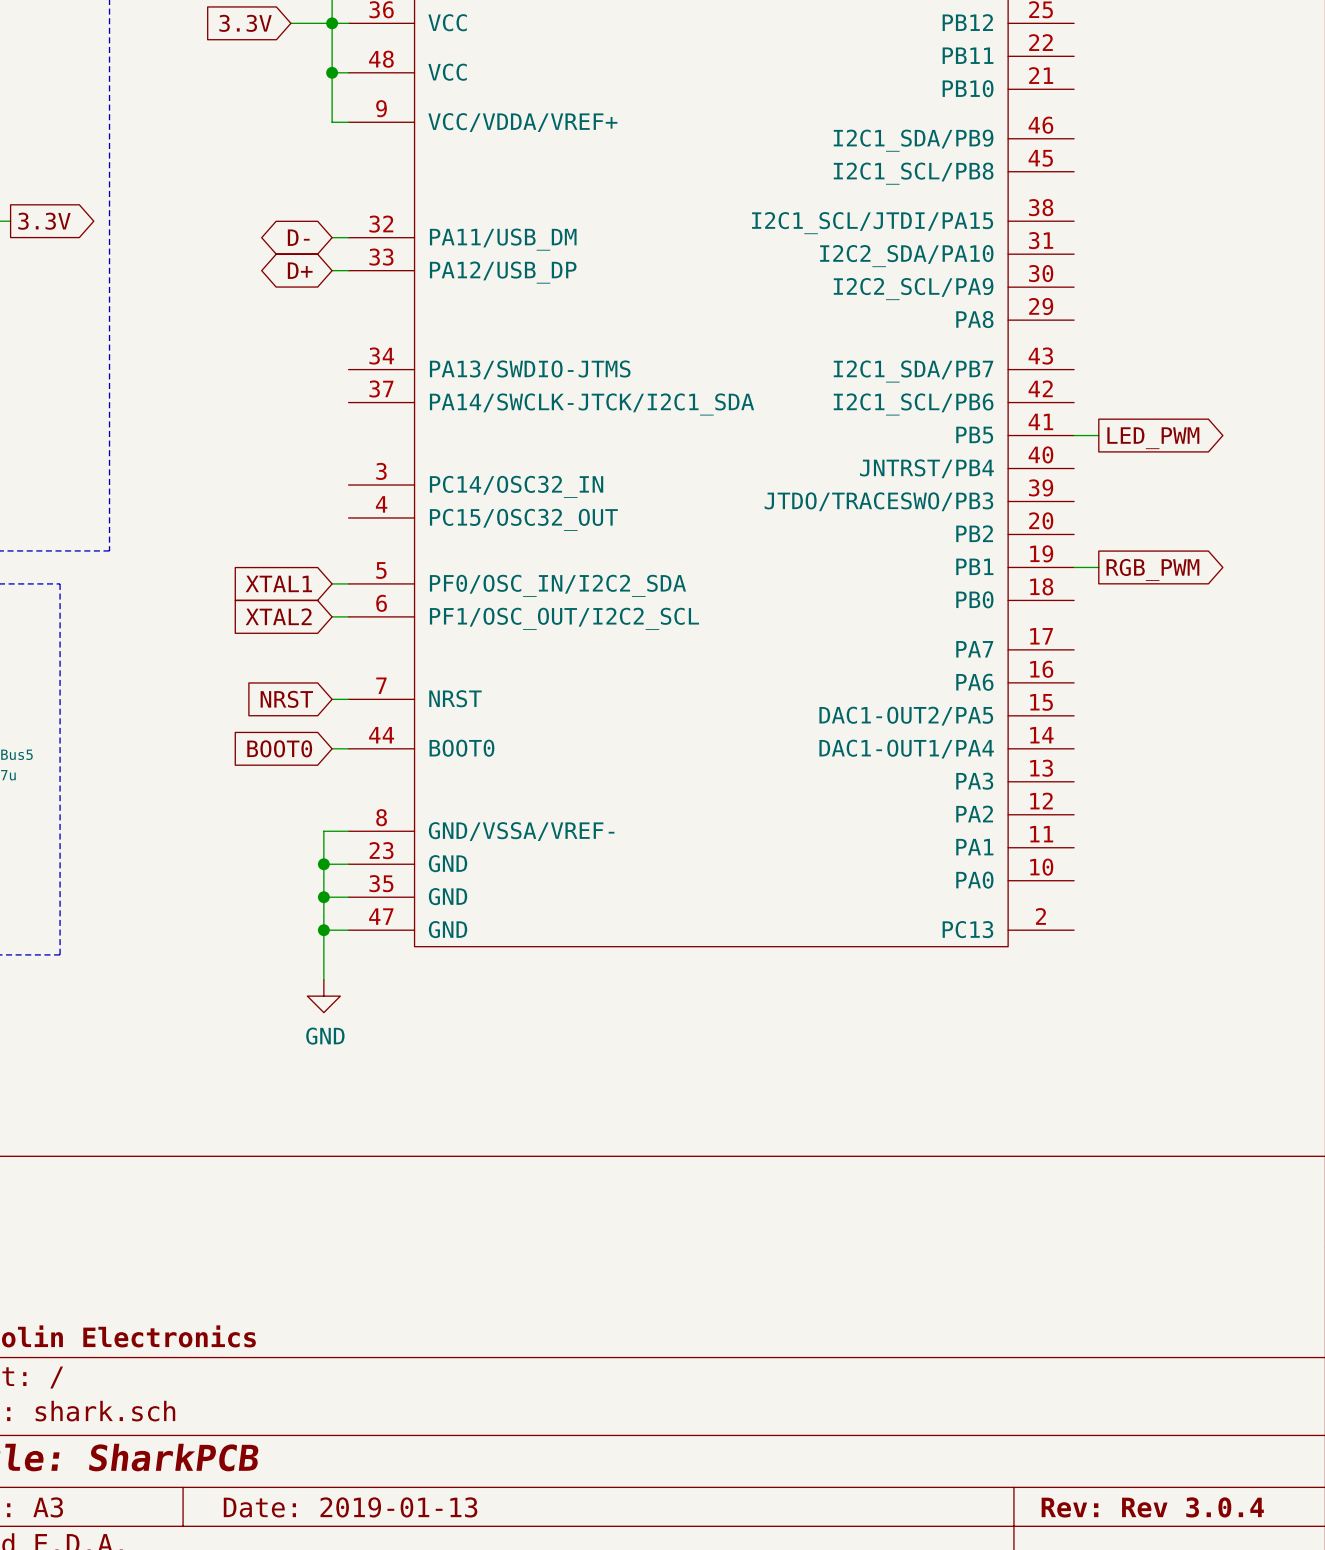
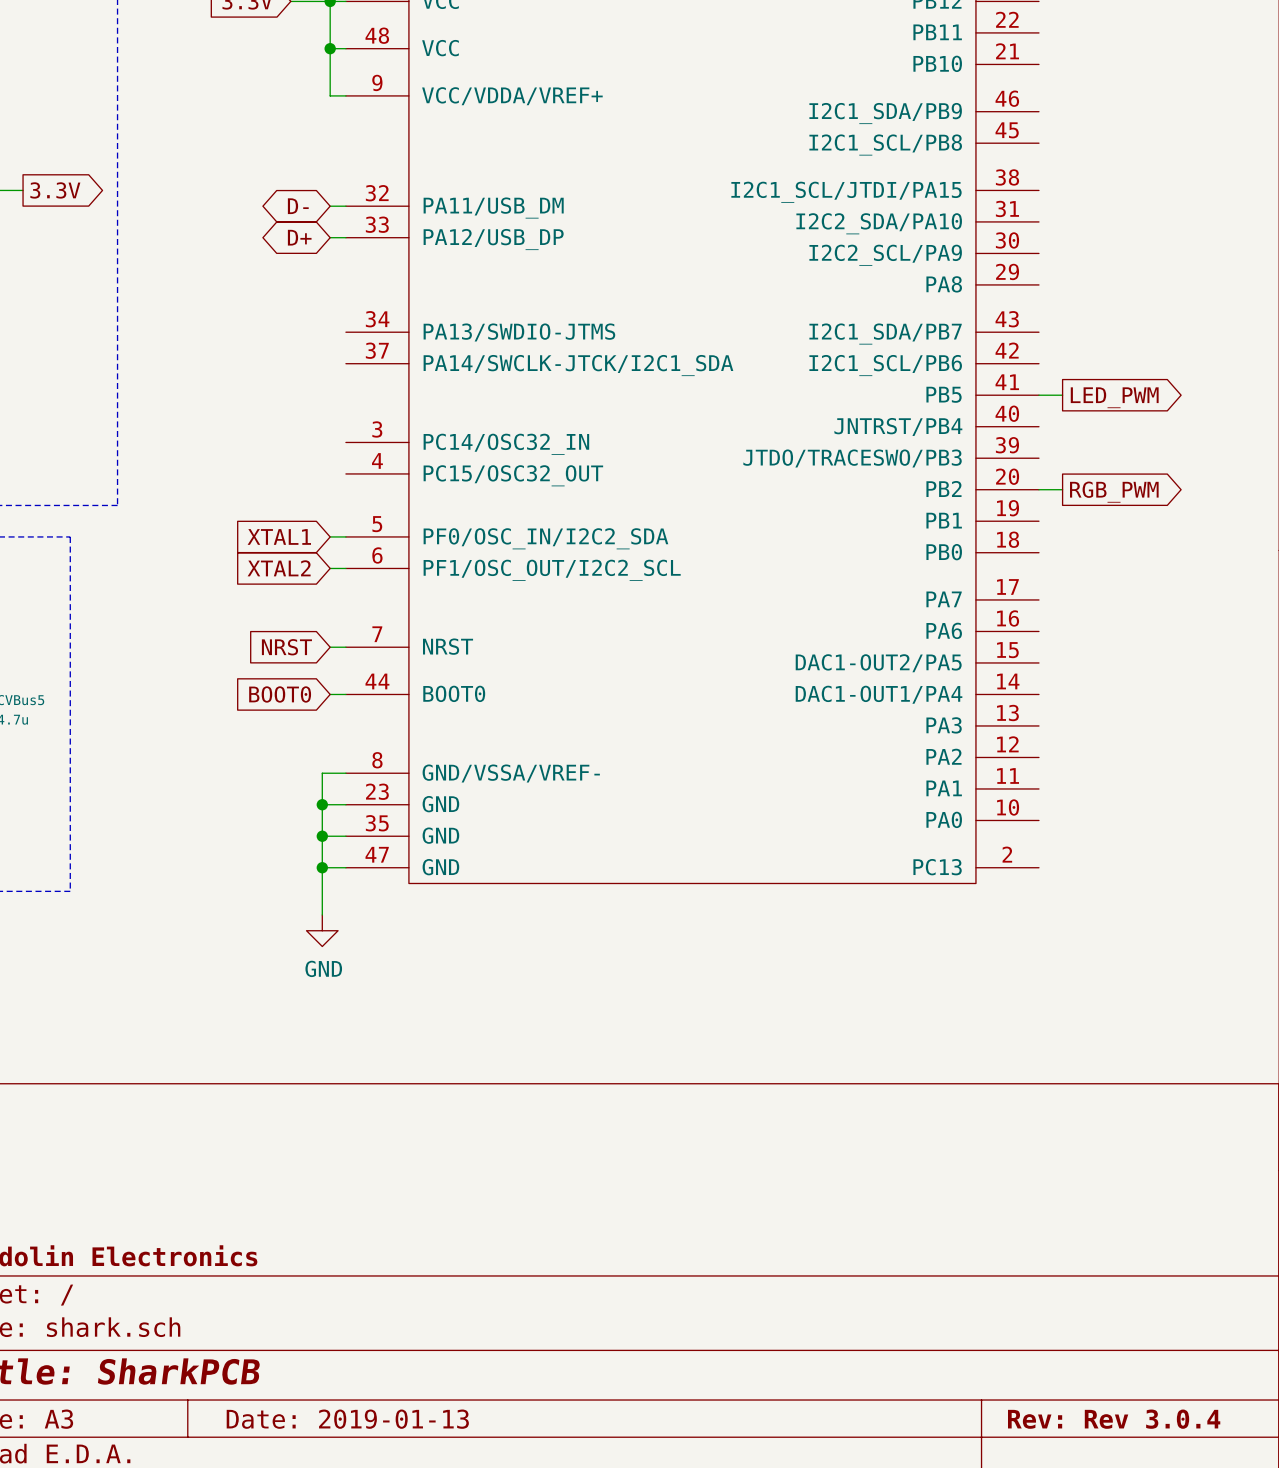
wire: (1074, 567) (1098, 567) -> (1038, 489) (1062, 489)
global label position: RGB_PWM (1152, 569) -> RGB_PWM (1114, 492)

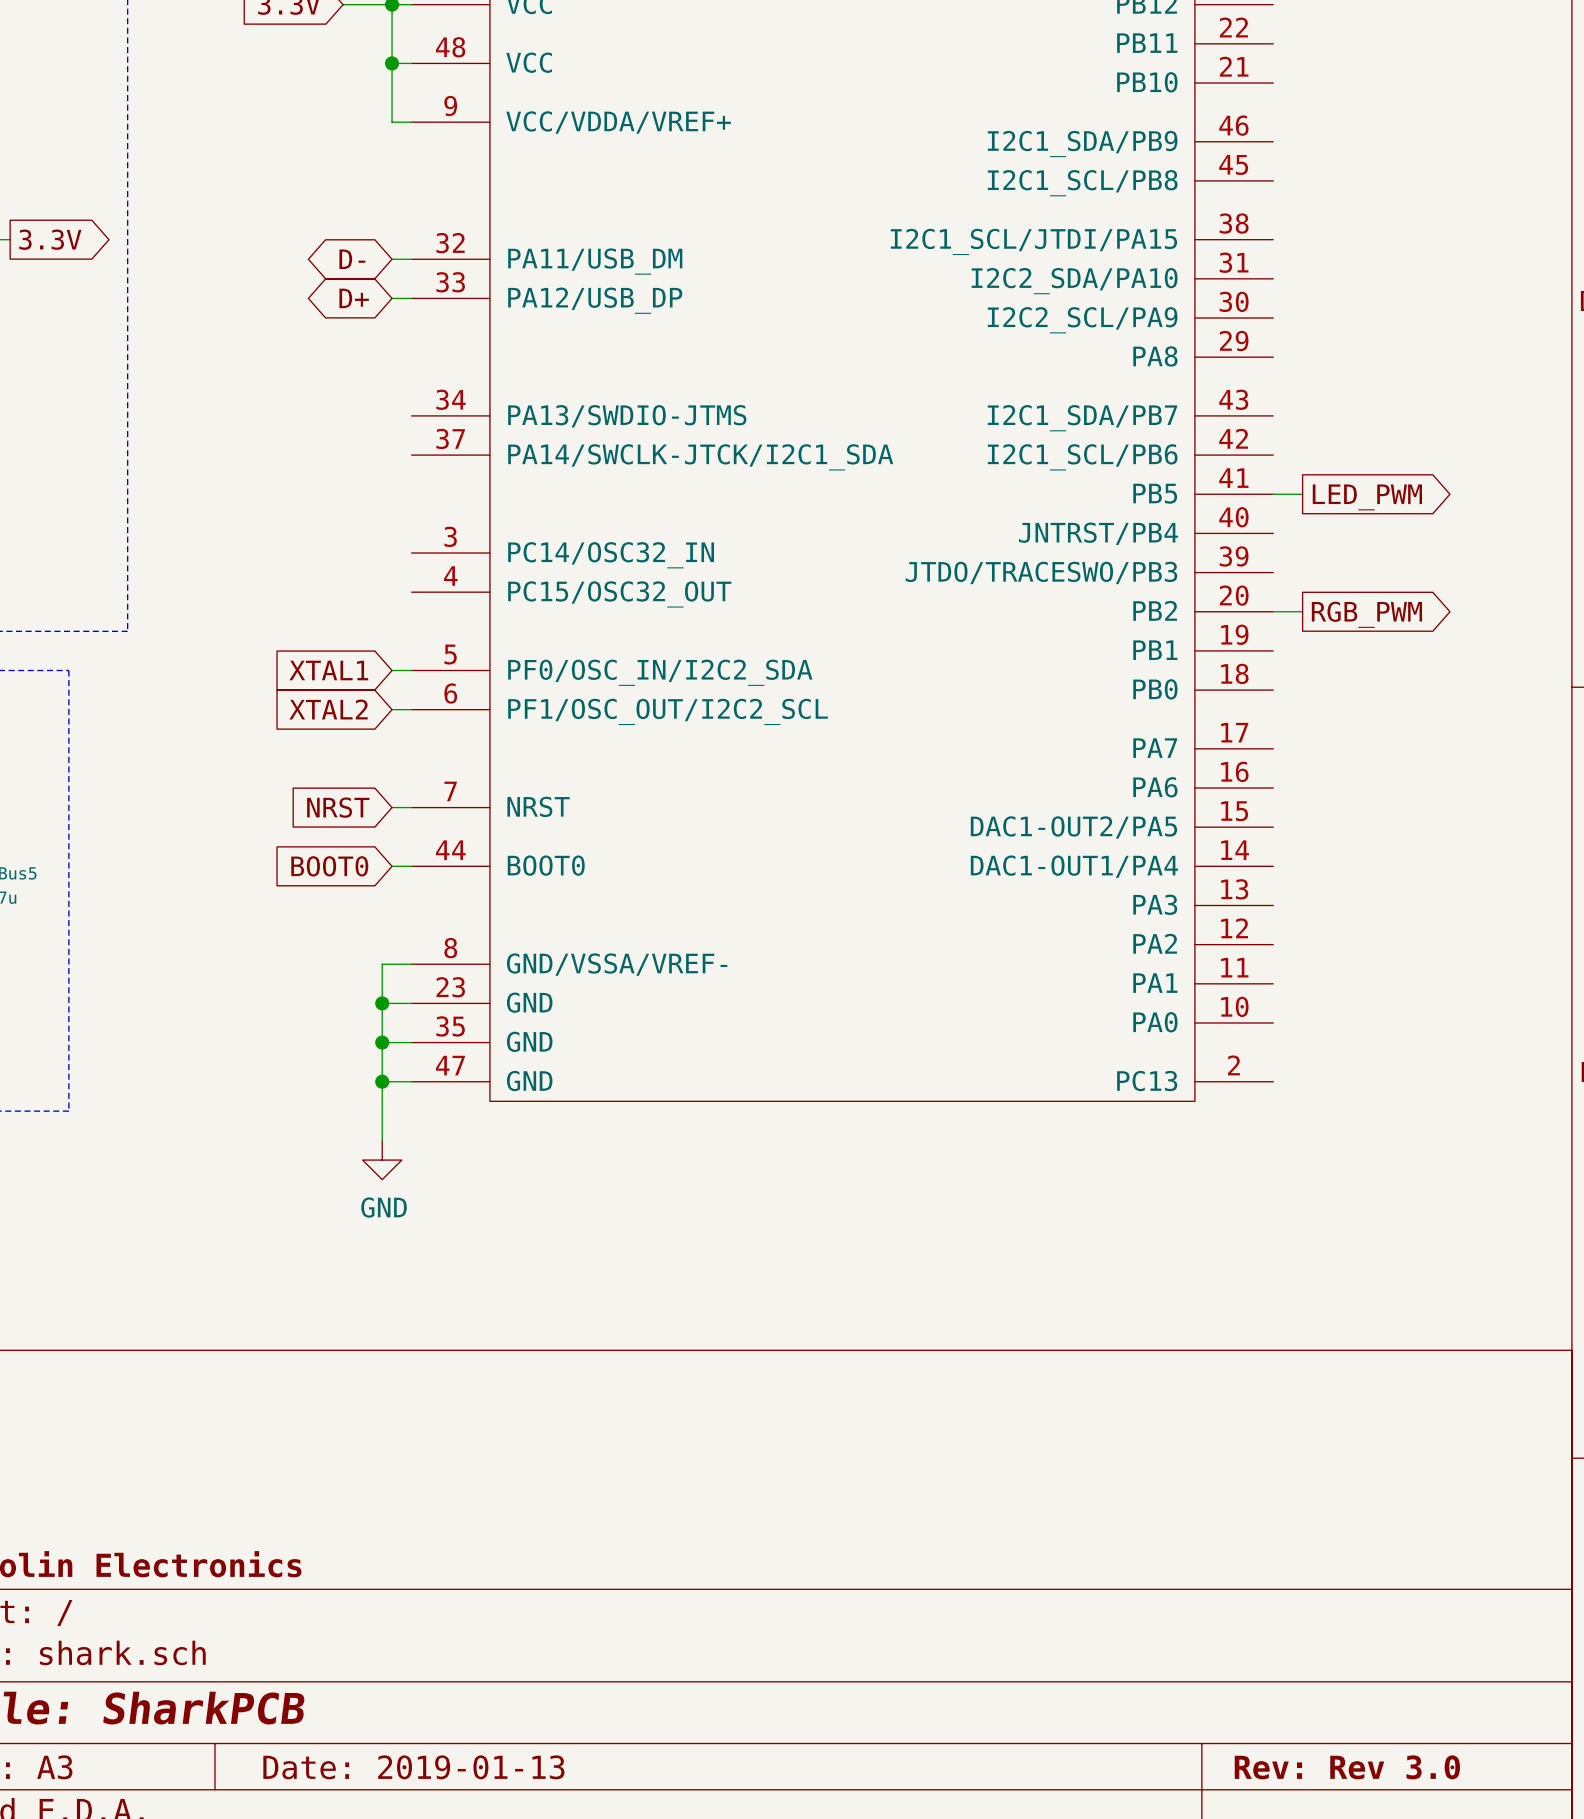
title block: Rev: Rev 3.0.4 (1114, 1419) -> Rev: Rev 3.0 (1347, 1767)

